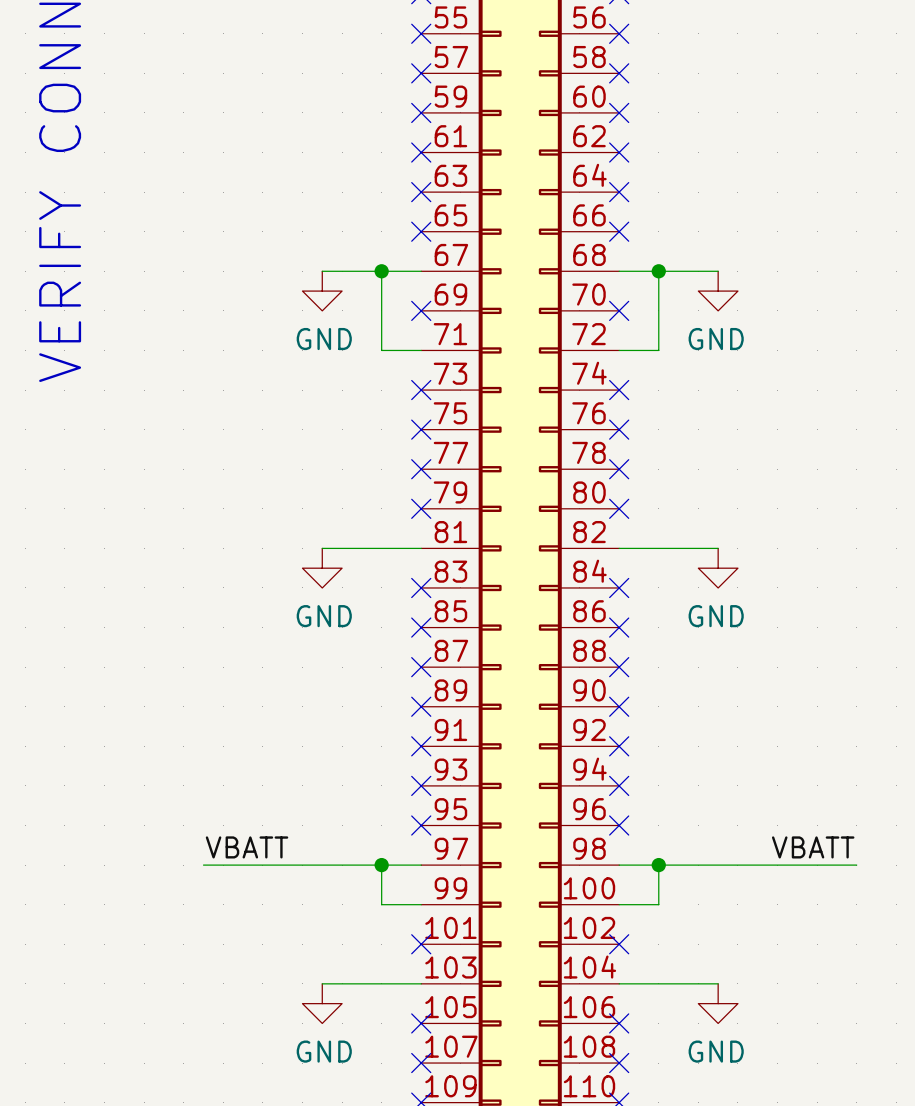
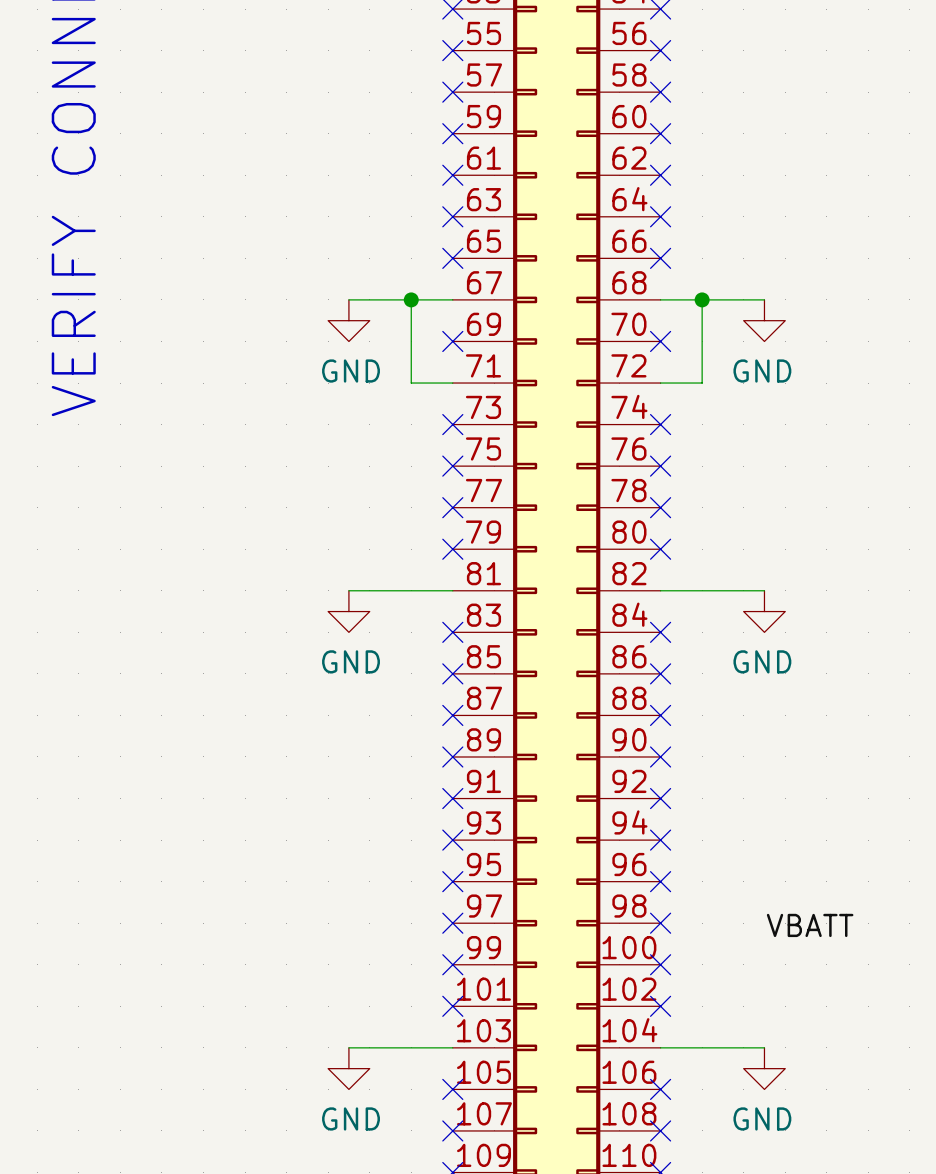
label: VBATT (247, 847) -> none
label position: VBATT (813, 847) -> VBATT (810, 925)
wire: (203, 865) (421, 865) -> none
wire: (381, 865) (381, 904) (421, 904) -> none
junction: (381, 865) -> none
no-connect mark: none -> (452, 923)
wire: (619, 865) (856, 865) -> none
no-connect mark: none -> (660, 923)
wire: (658, 865) (658, 904) (619, 904) -> none
junction: (658, 865) -> none
no-connect mark: none -> (452, 964)
no-connect mark: none -> (660, 964)

